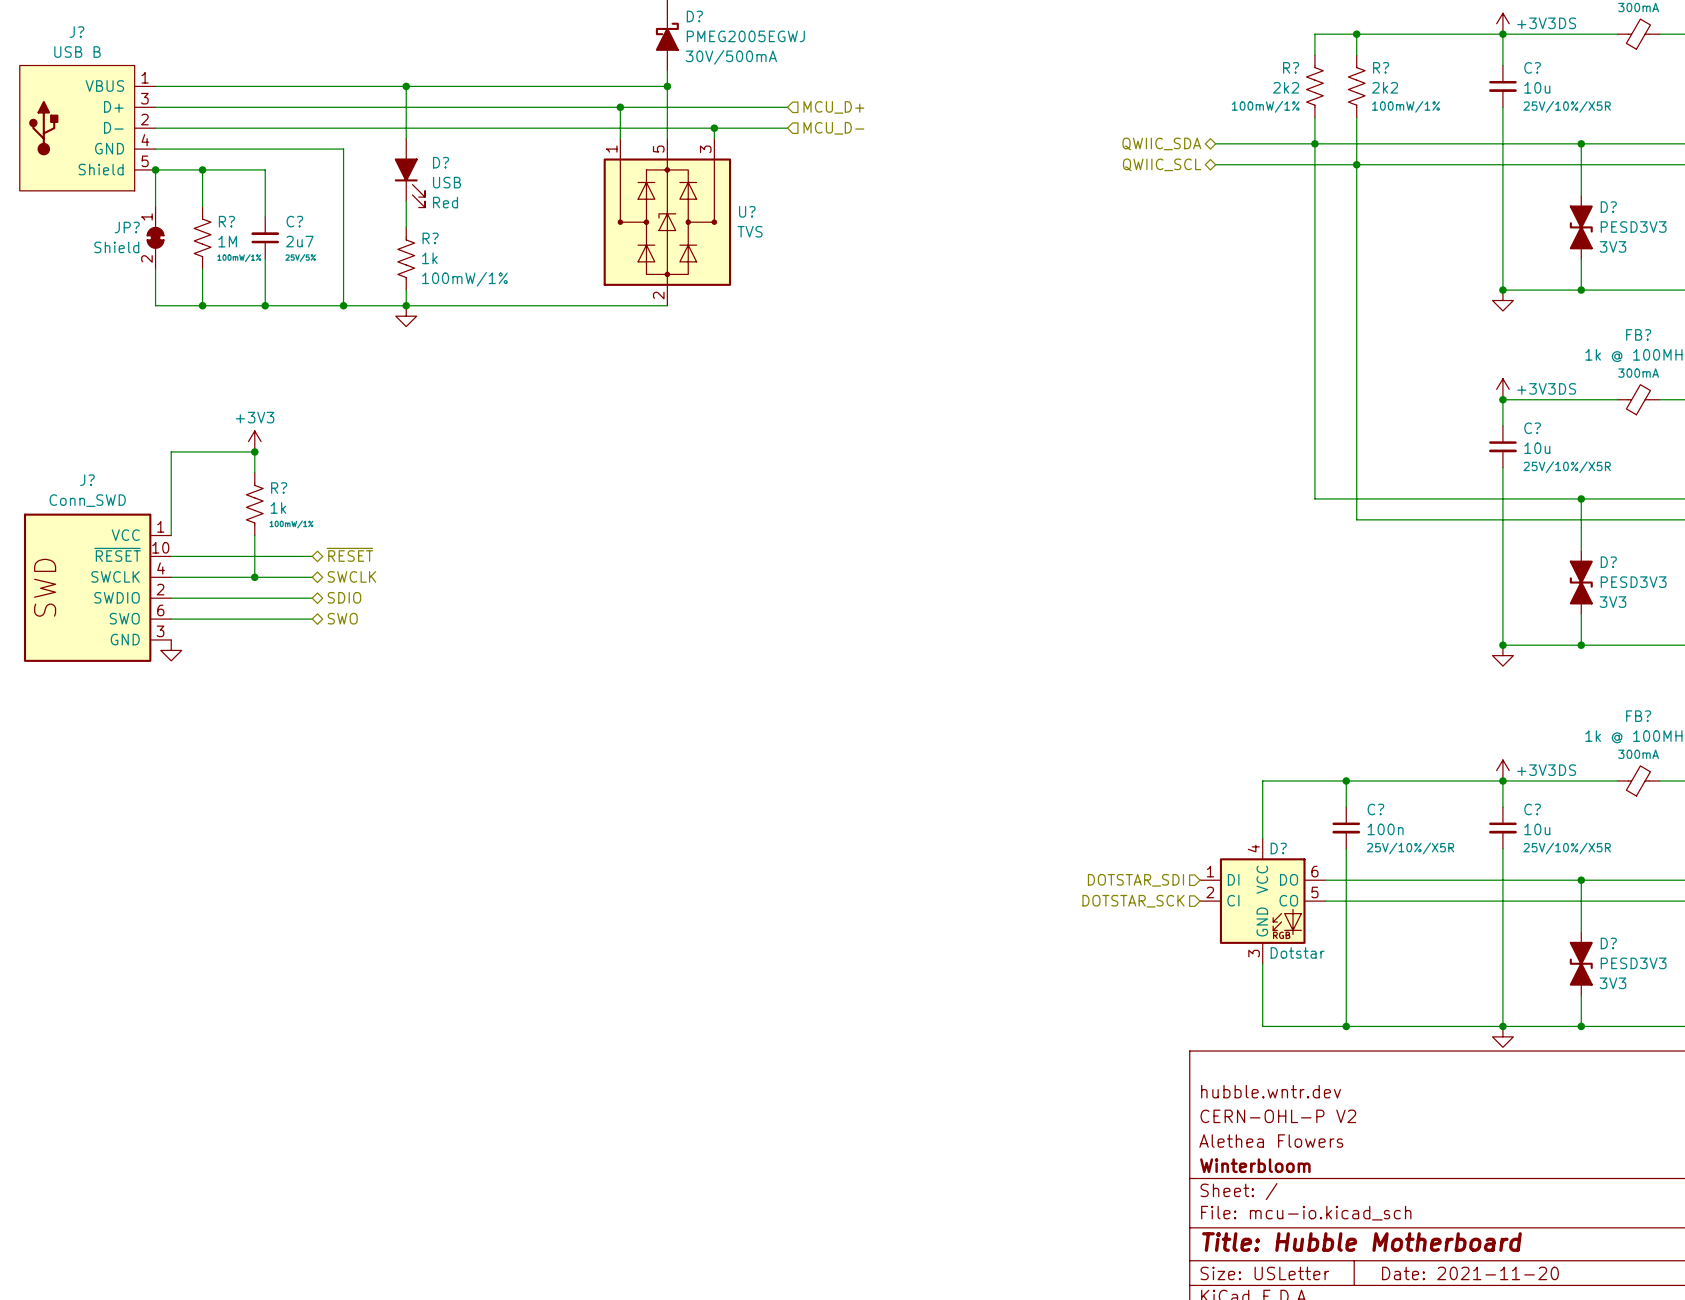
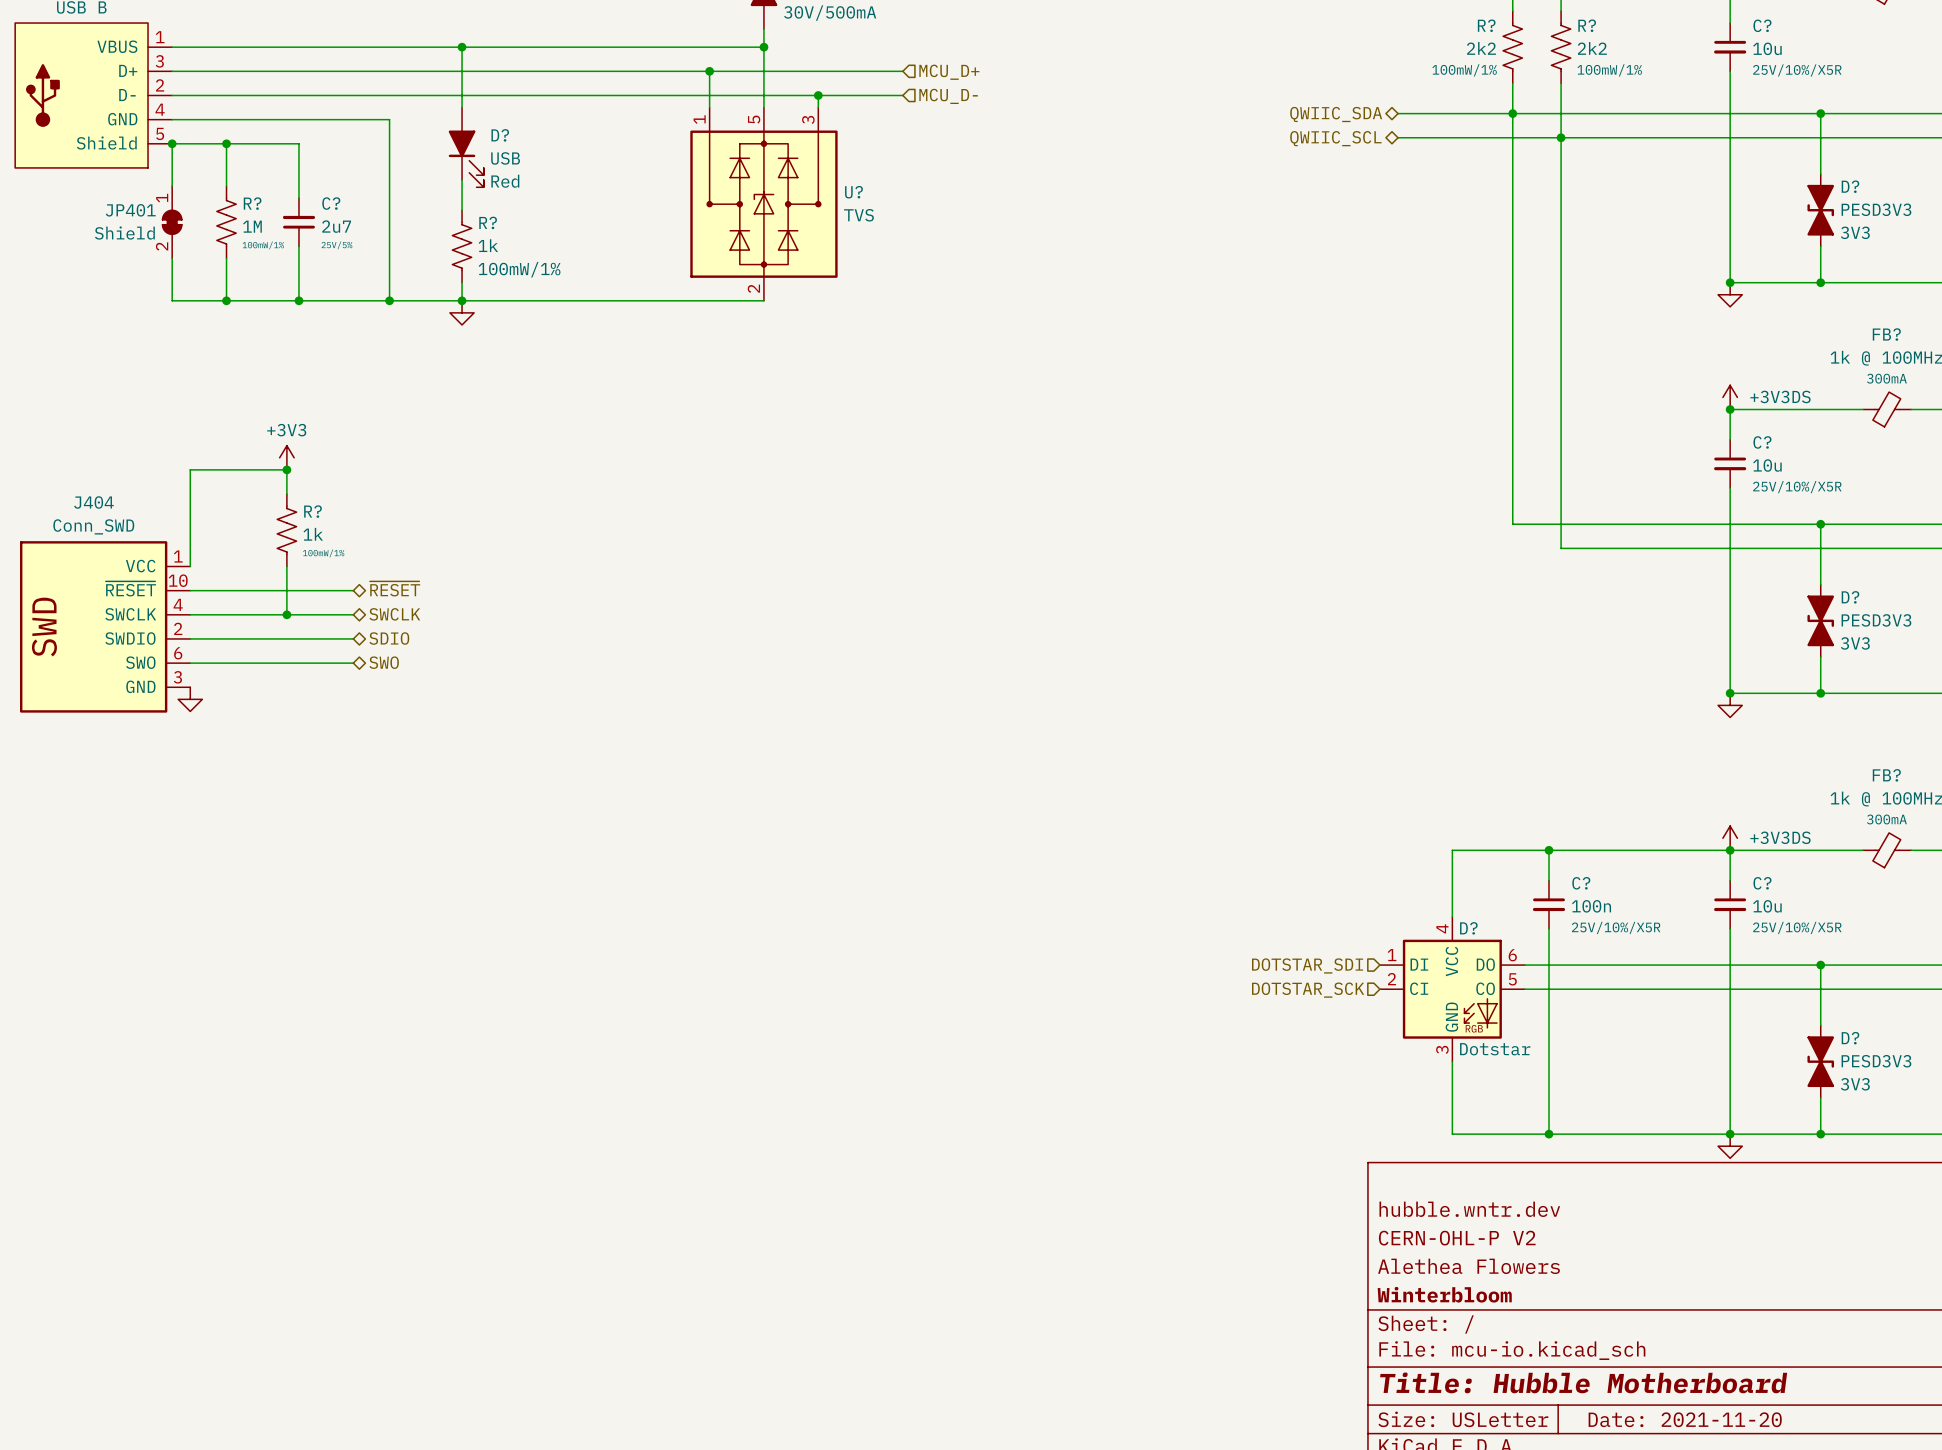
JP? name: JP? (127, 227) -> JP401 (130, 210)
J? name: J? (87, 480) -> J404 (93, 502)

